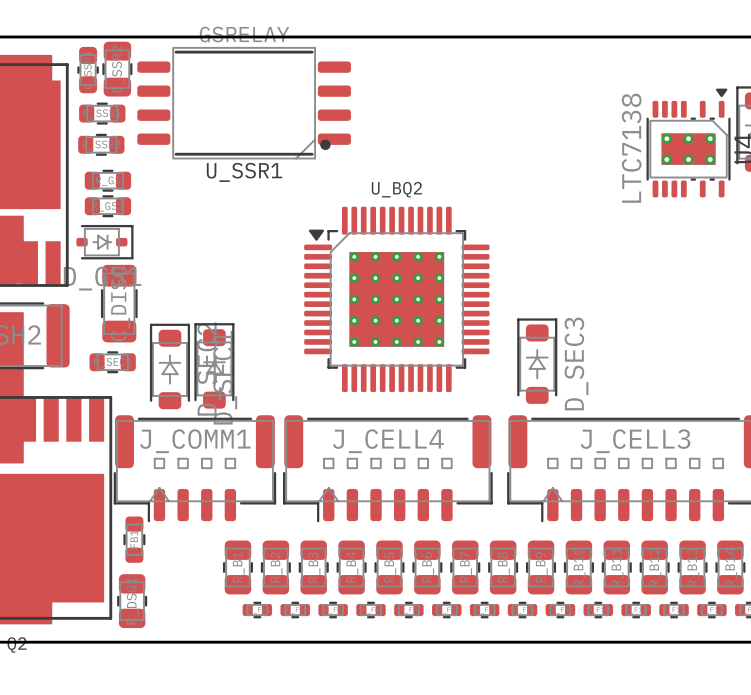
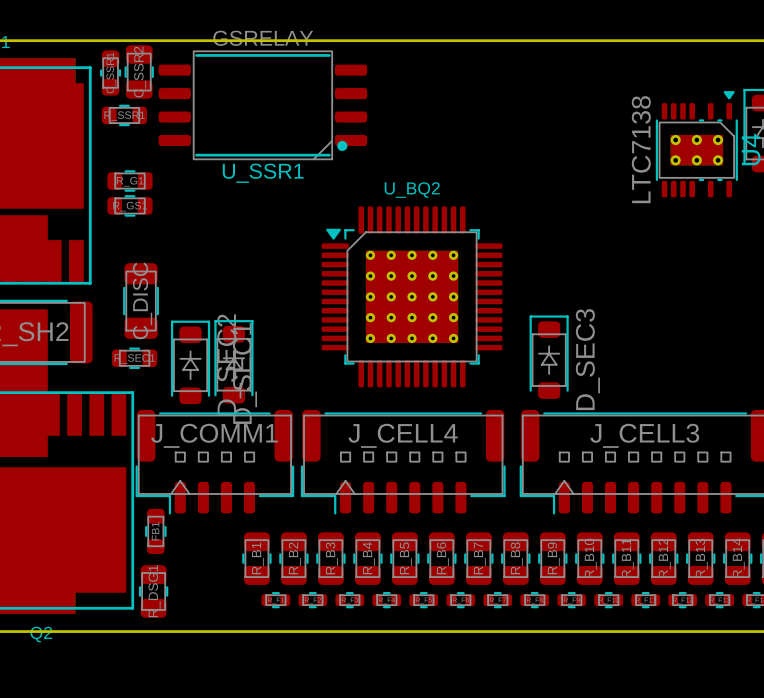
part: (101, 144) -> none
part: (104, 242) -> none

